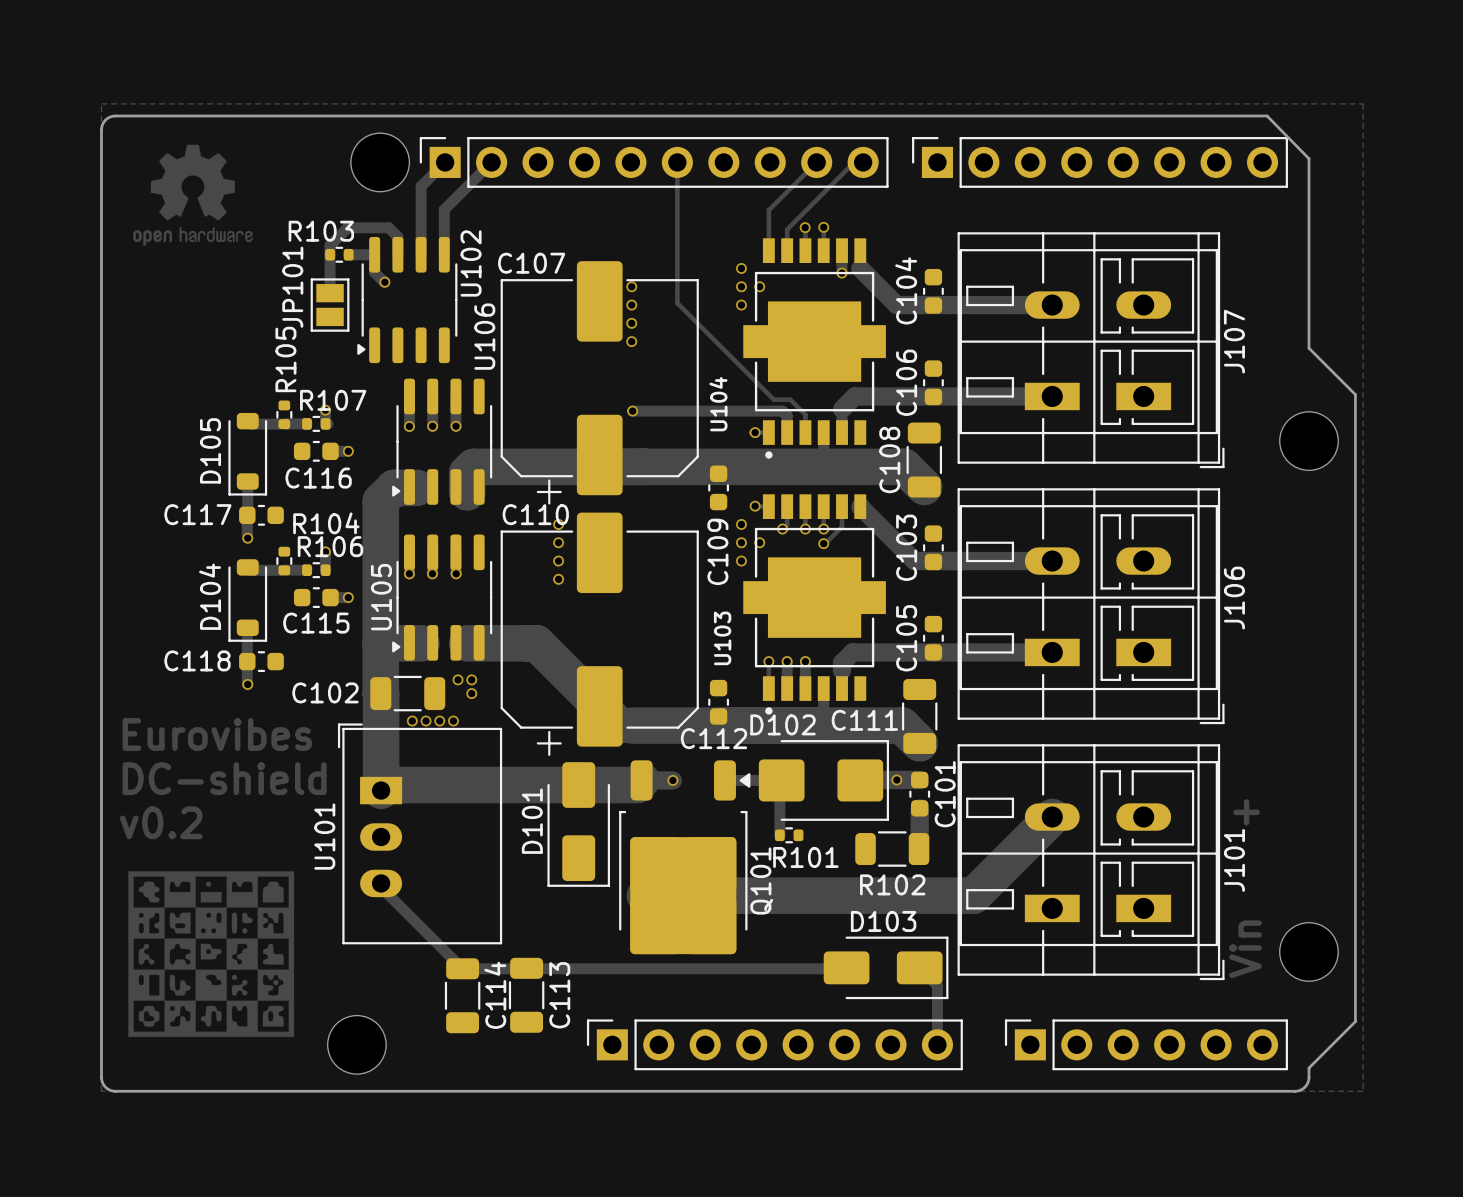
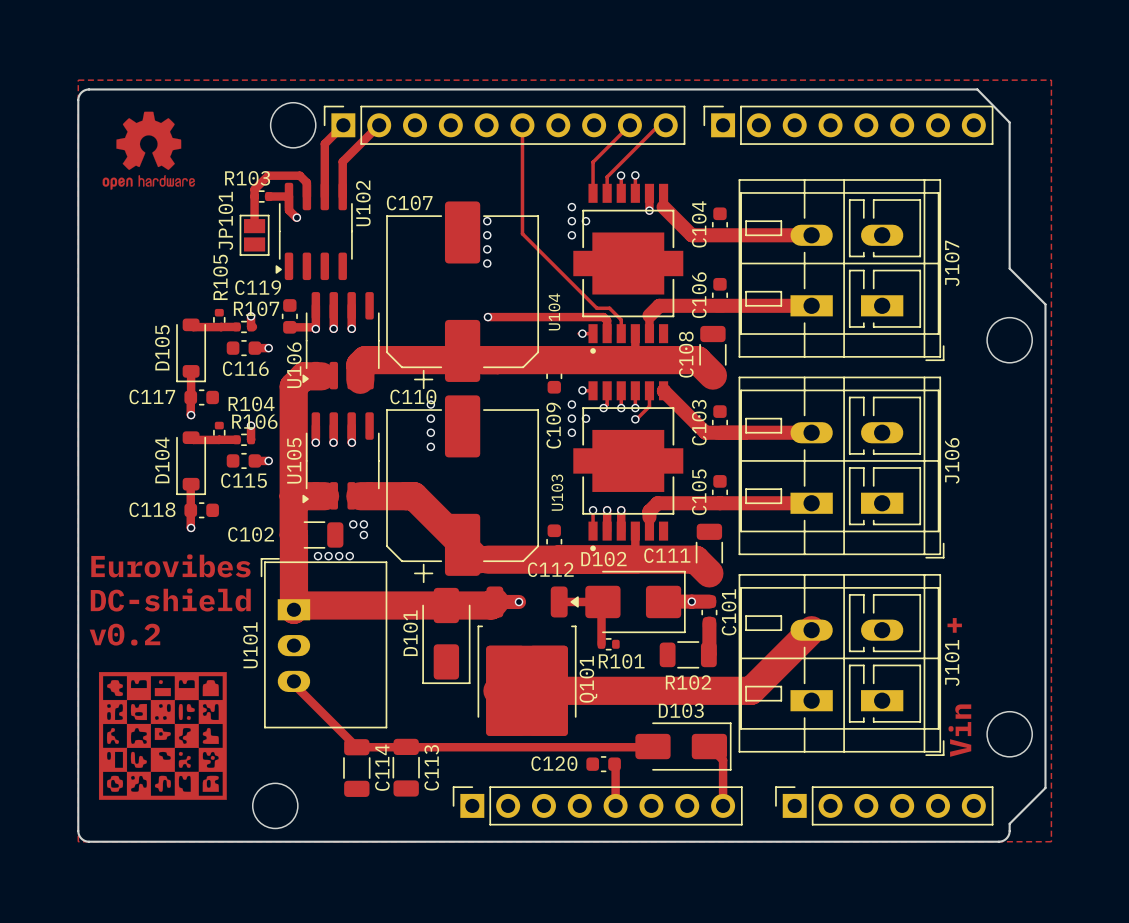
U106 name position: U106 (484, 336) -> U106 (294, 365)
C119: none -> (289, 316)
track: none -> (289, 327) (314, 327) (315, 328)
C120: none -> (603, 764)
track: none -> (614, 764) (615, 805)

